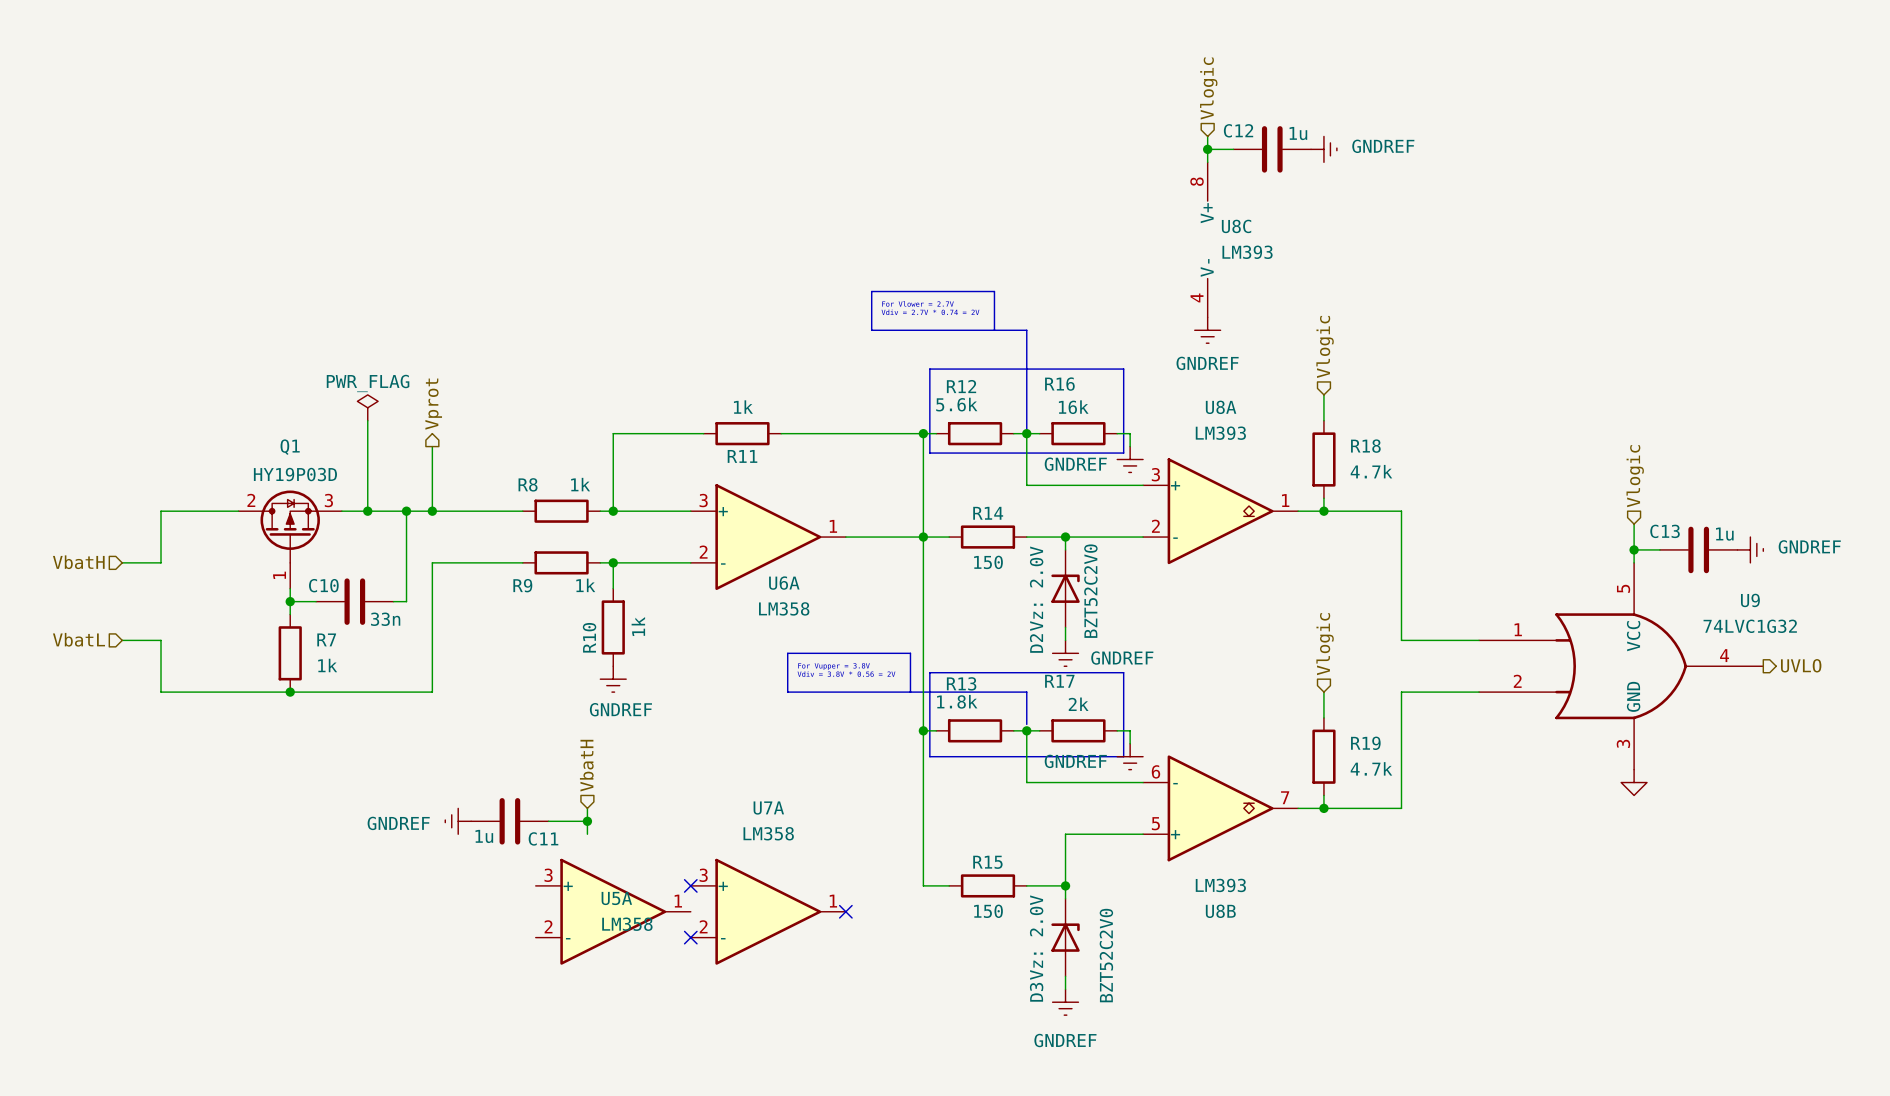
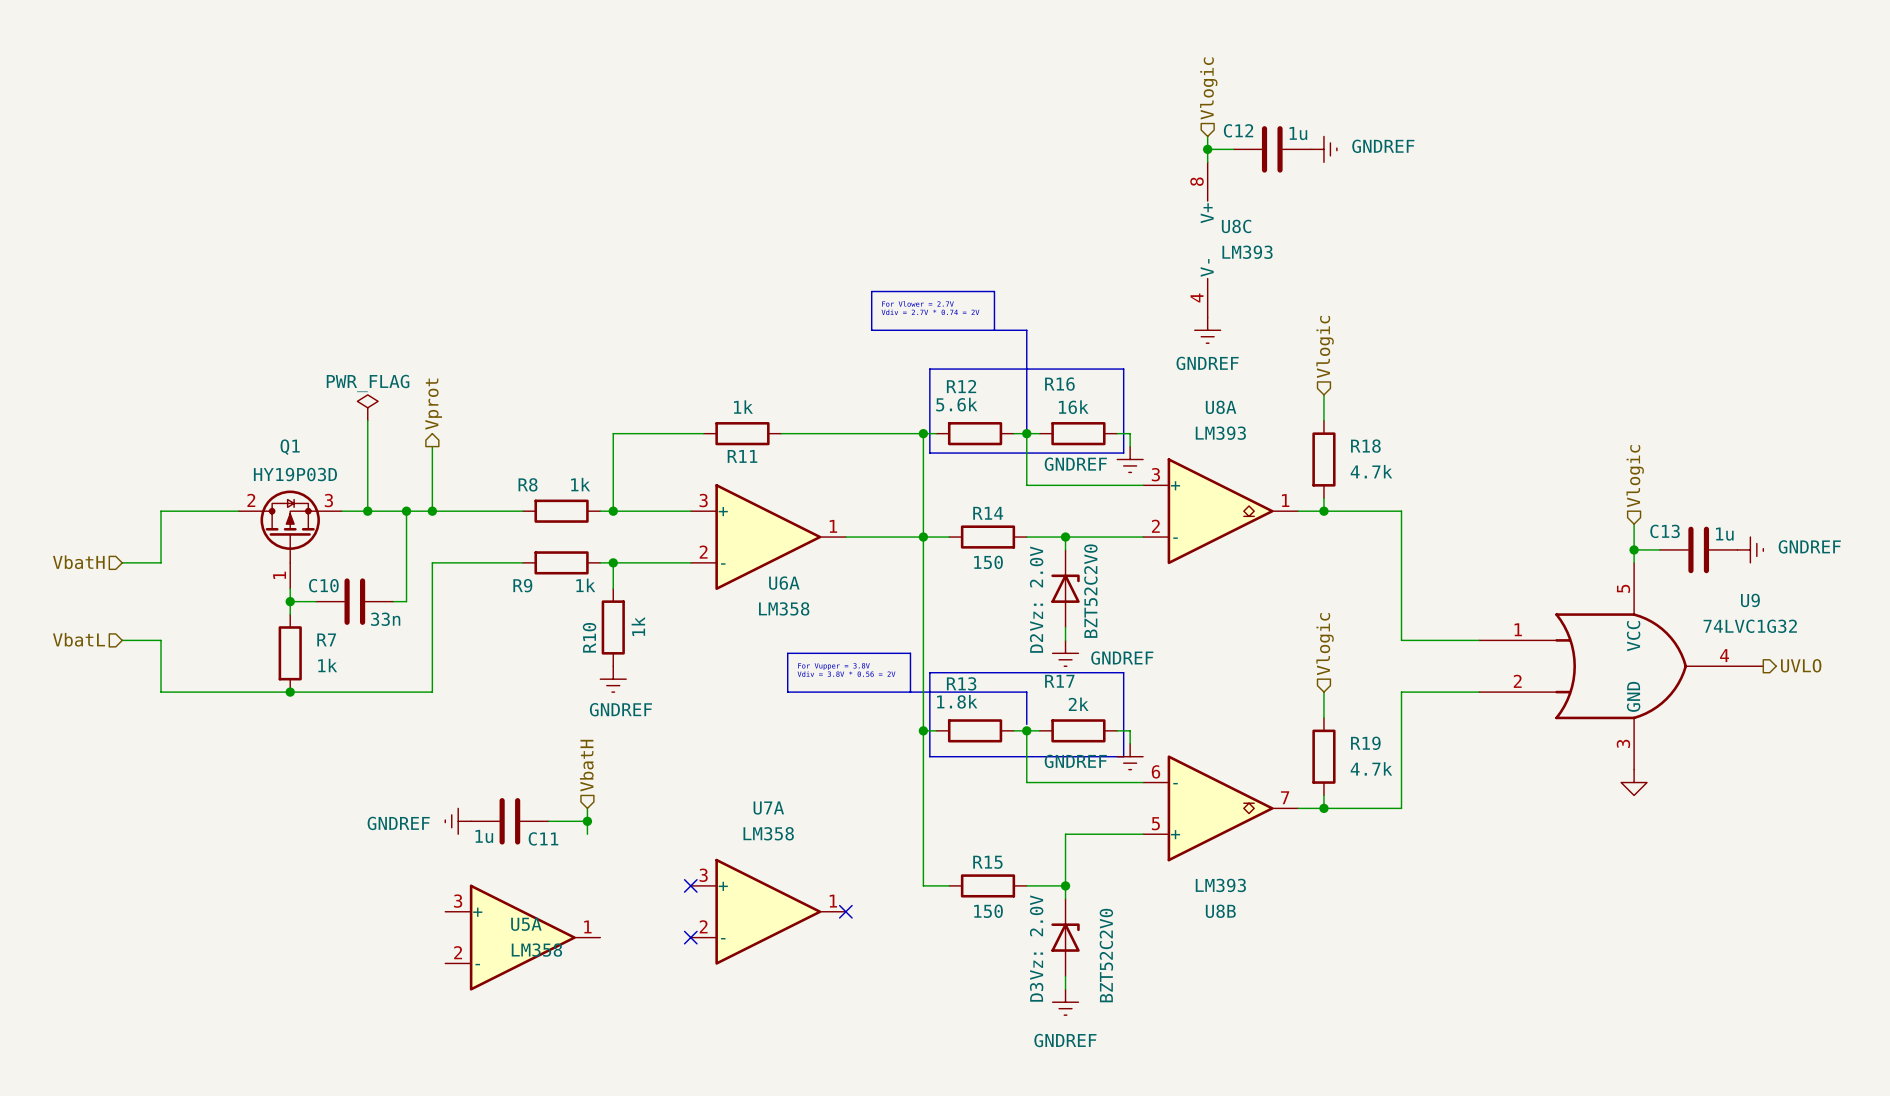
U5A position: (613, 911) -> (522, 937)

